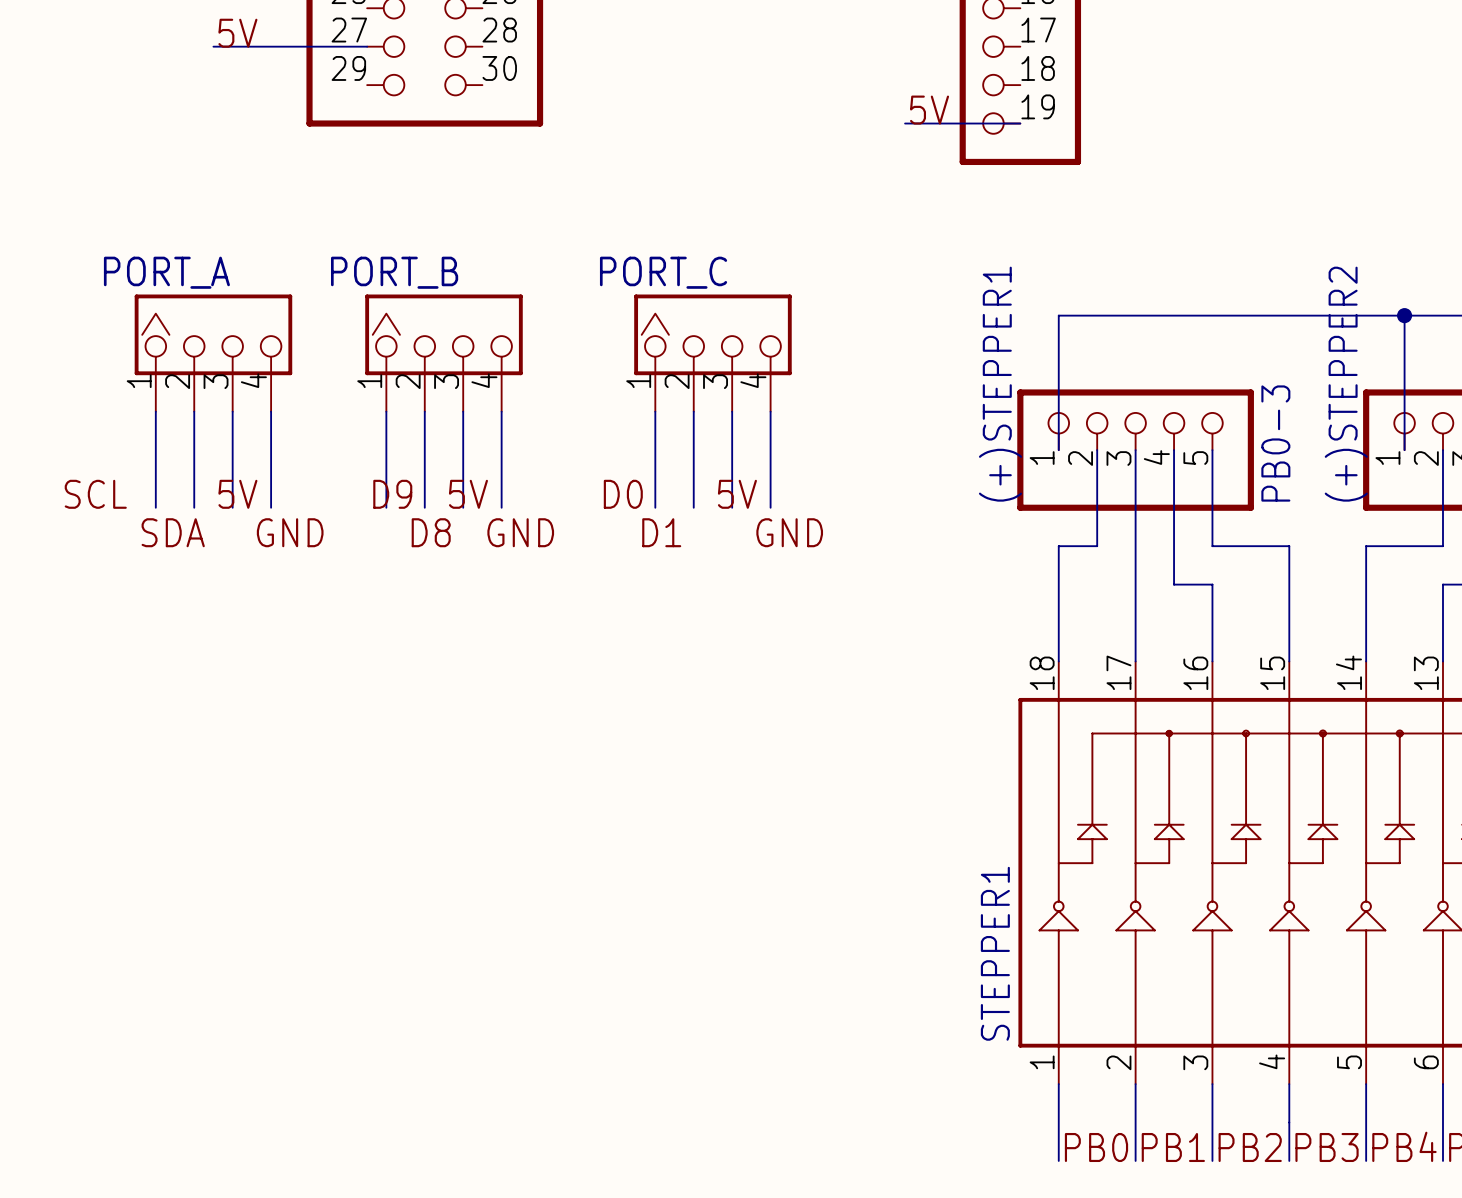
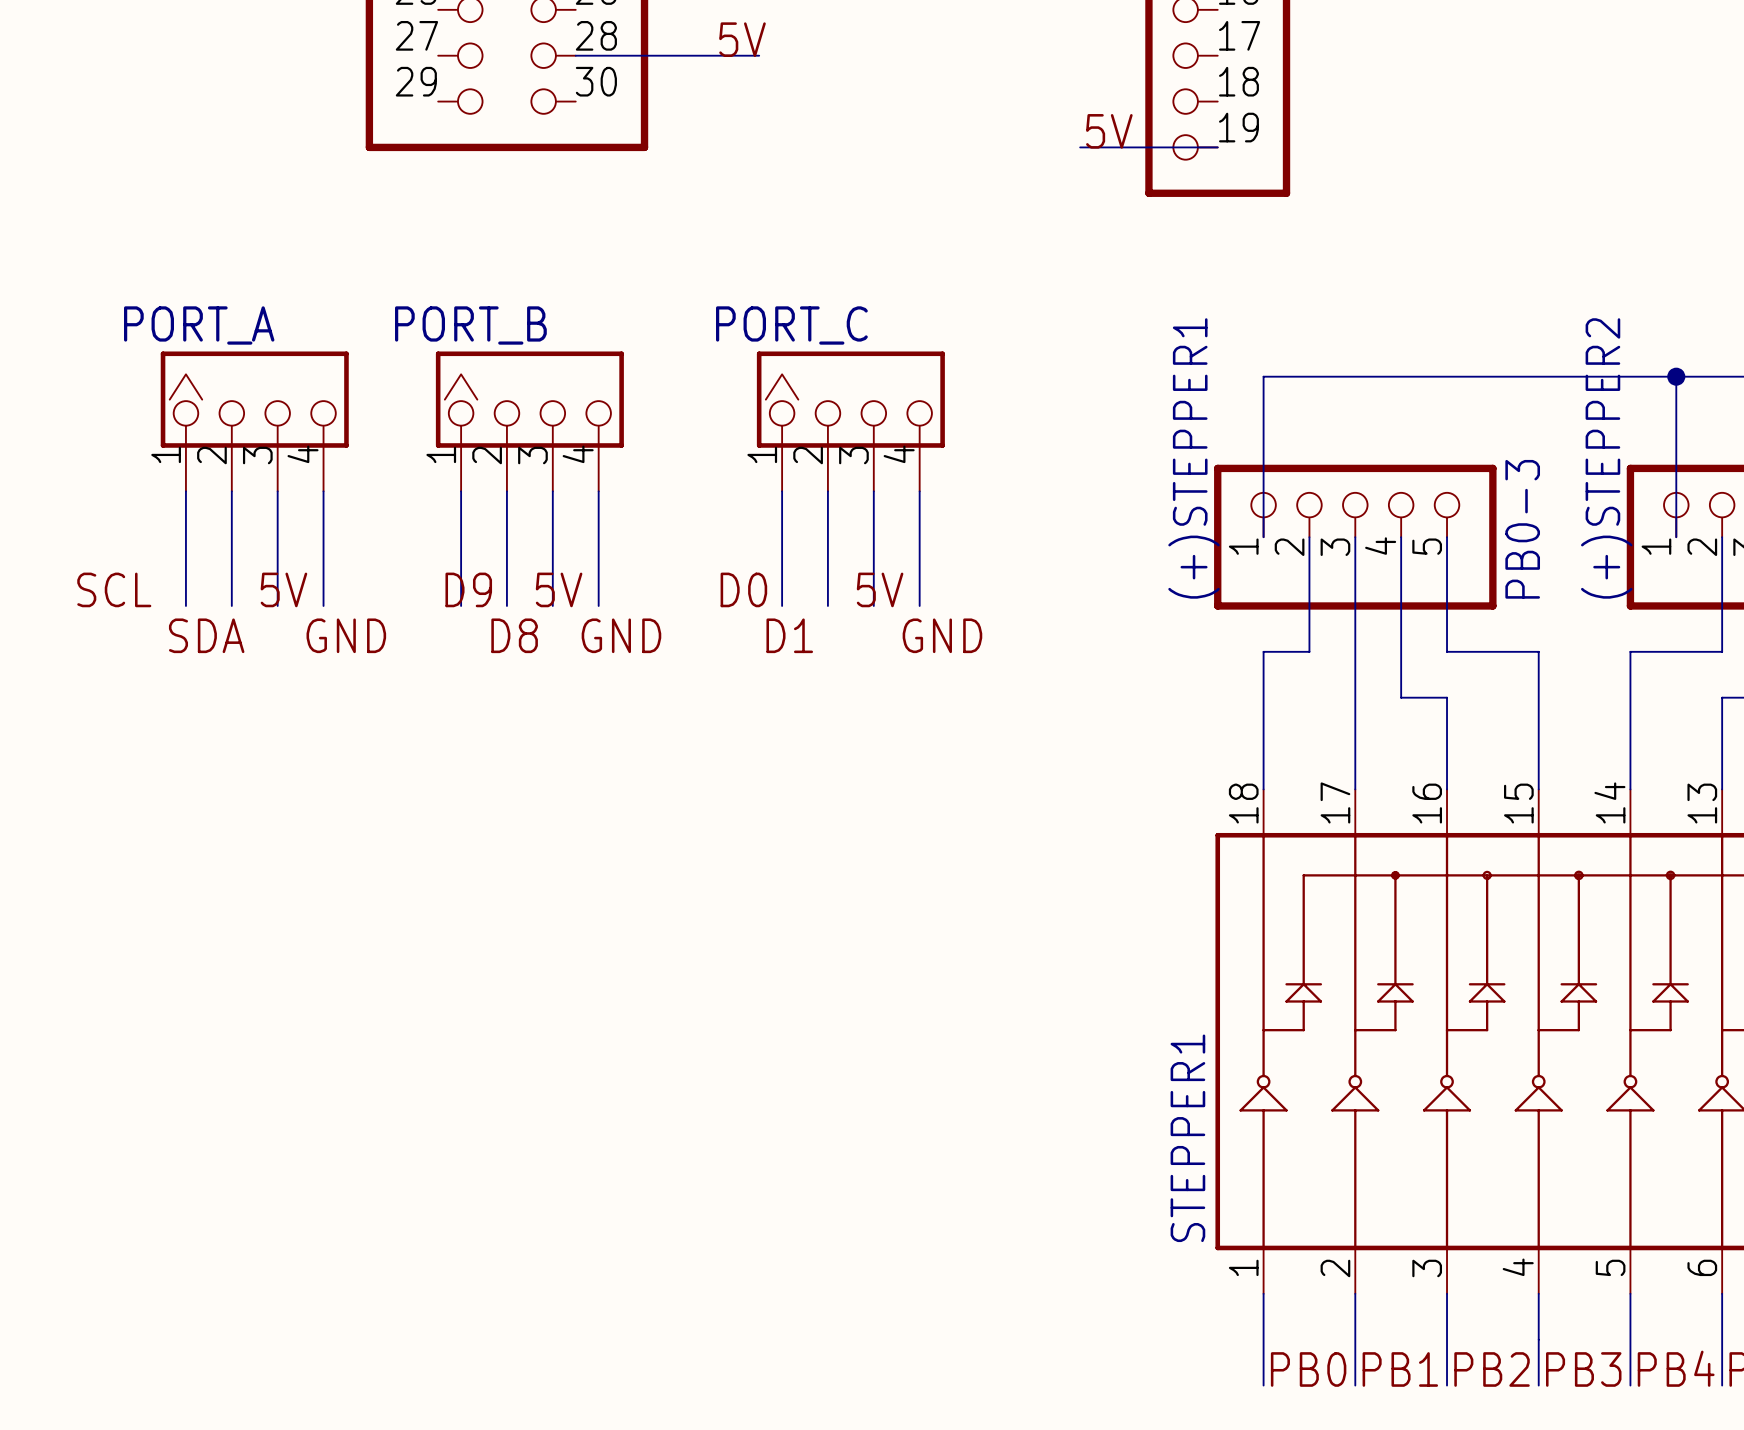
label: 5V (237, 33) -> none
label: none -> 5V (742, 39)
wire: (213, 46) (367, 46) -> (575, 55) (759, 55)

